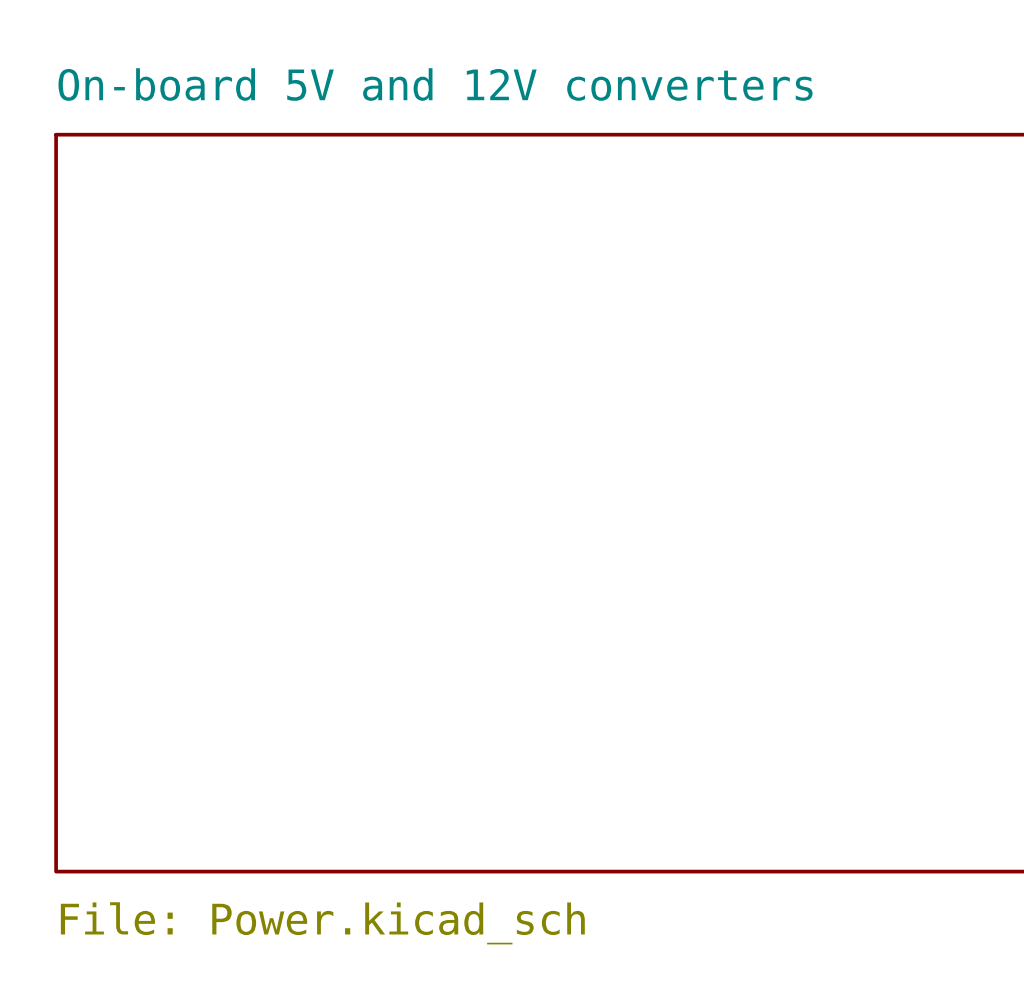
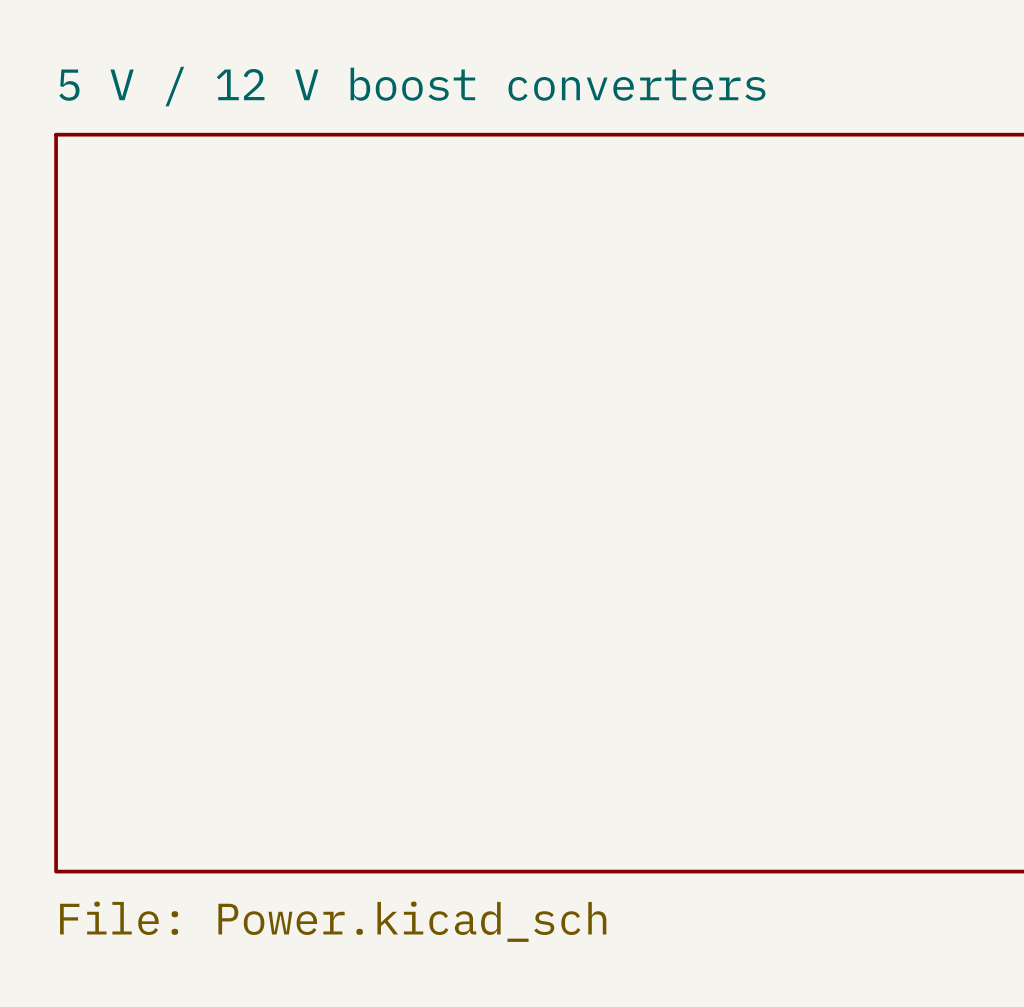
sheet On-board 5V and 12V converters name: On-board 5V and 12V converters (435, 84) -> 5 V / 12 V boost converters (412, 86)

